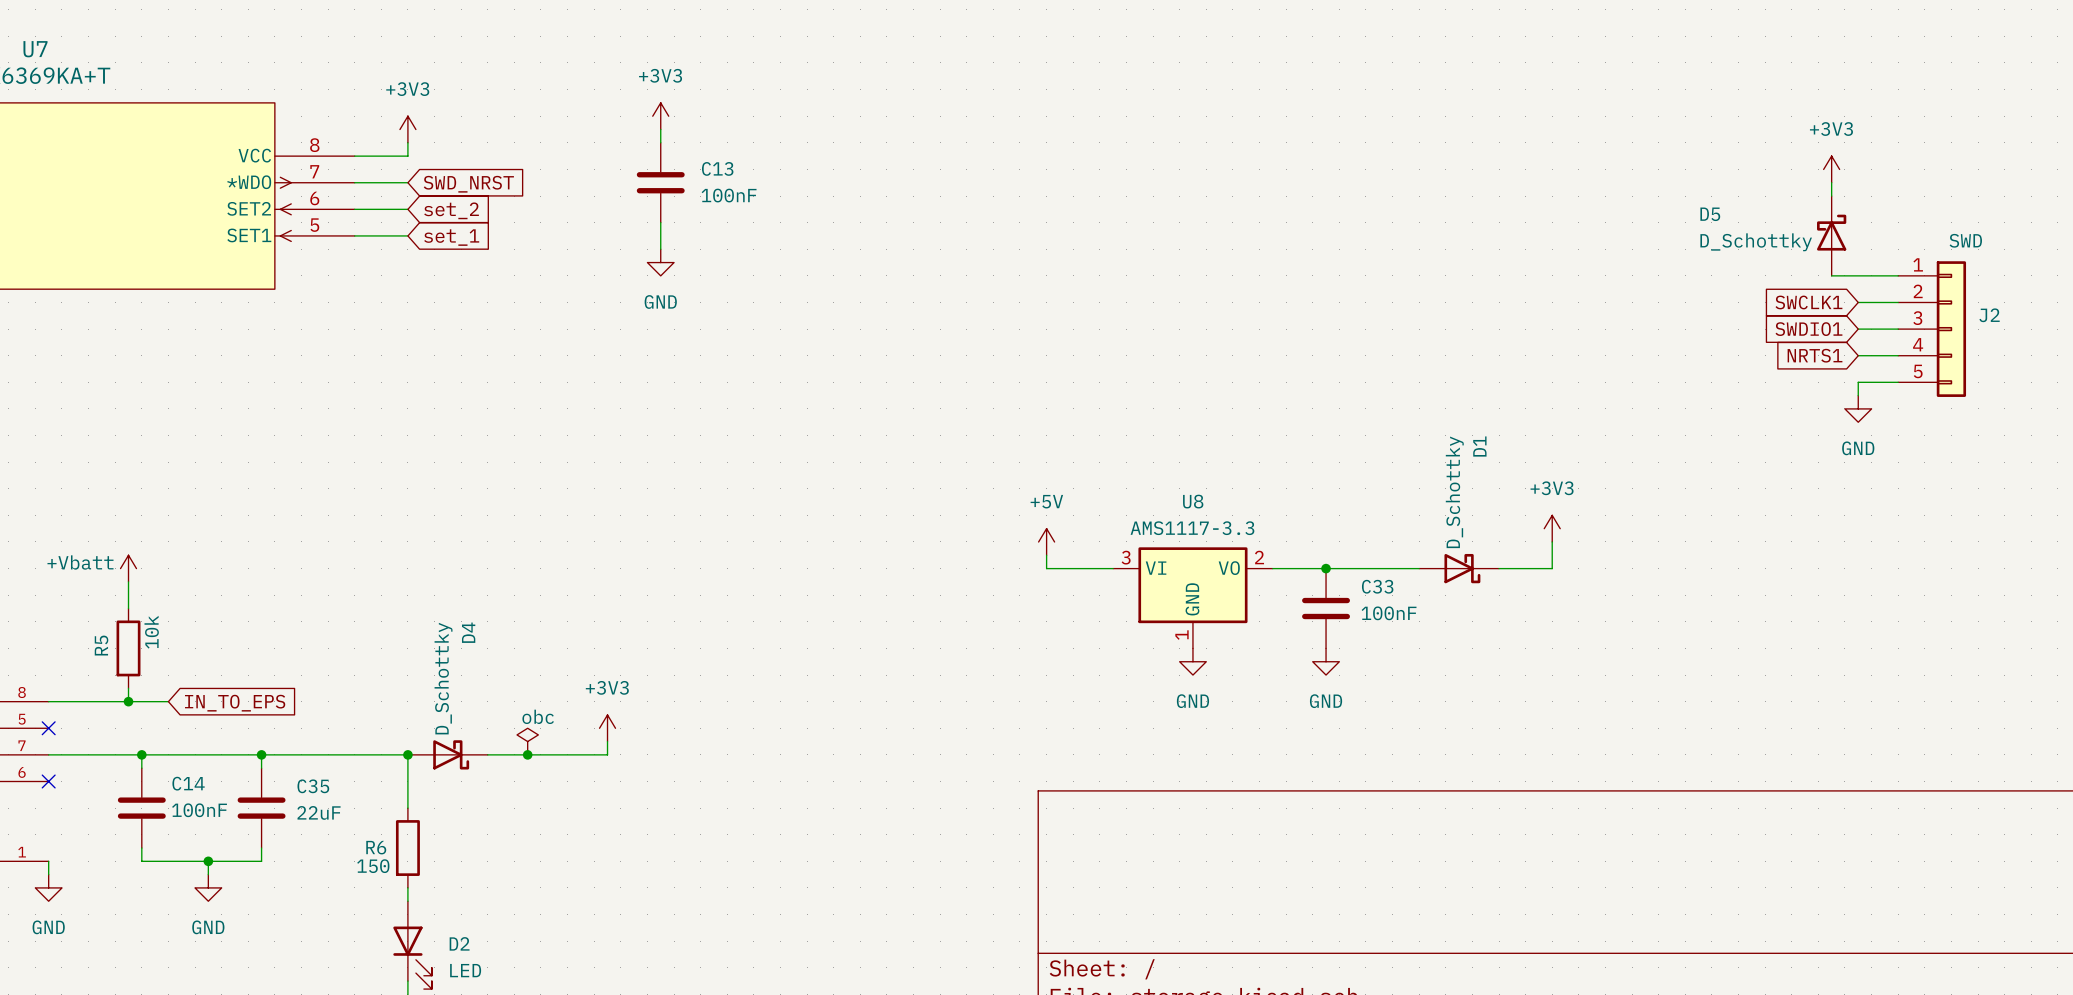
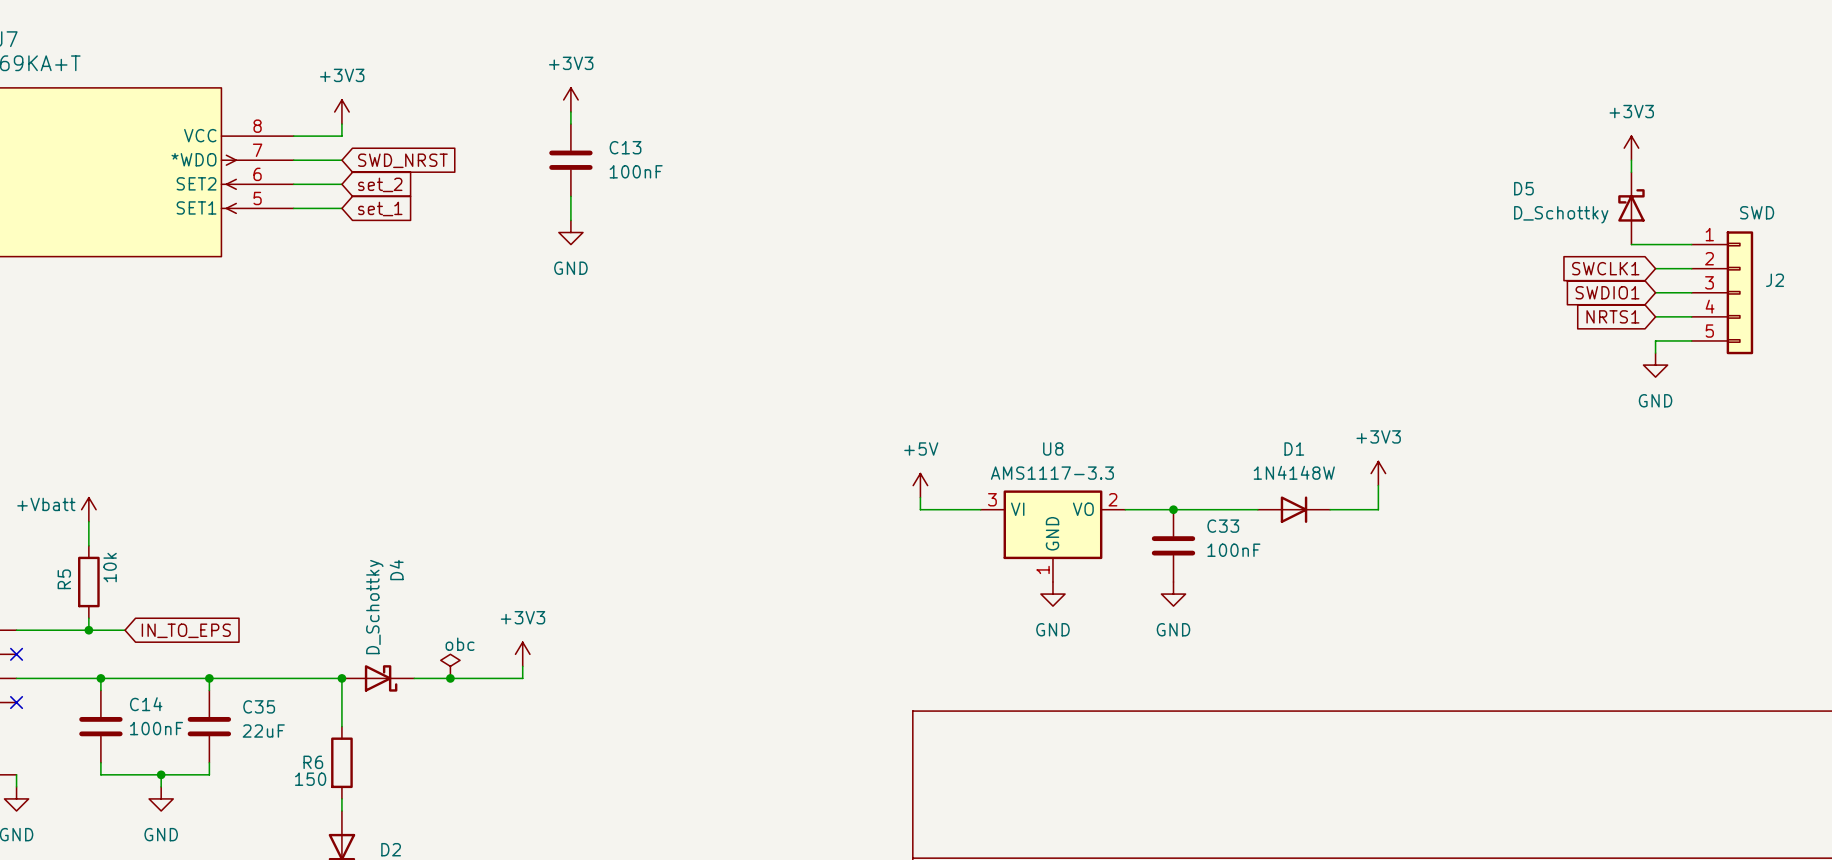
D1 name rotation: 0° (1479, 446) -> 90° clockwise (1294, 448)
D1 name position: D1 (1479, 446) -> D1 (1294, 448)
D1 value: D_Schottky (1454, 492) -> 1N4148W (1294, 472)
D1 symbol: [1419, 553, 1500, 584] -> [1257, 496, 1331, 523]

